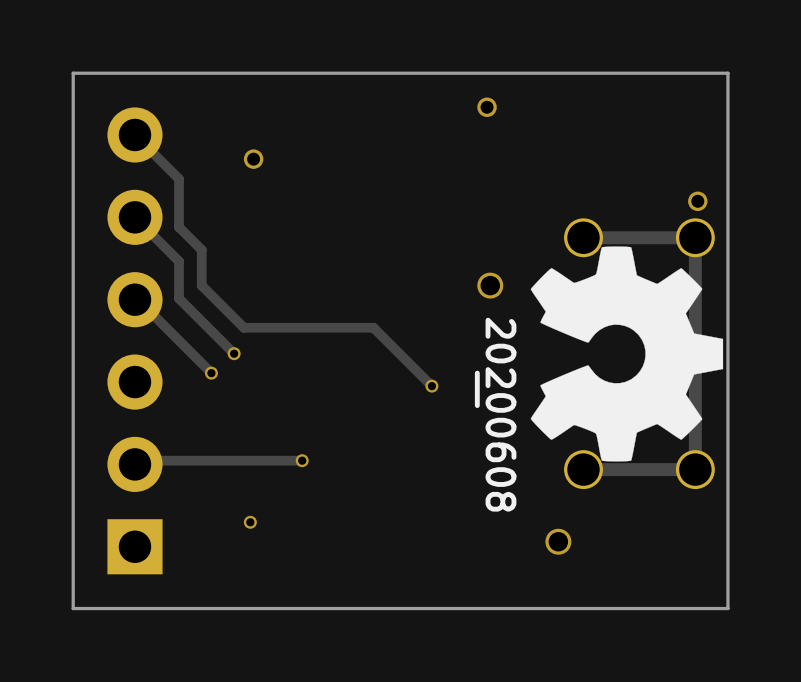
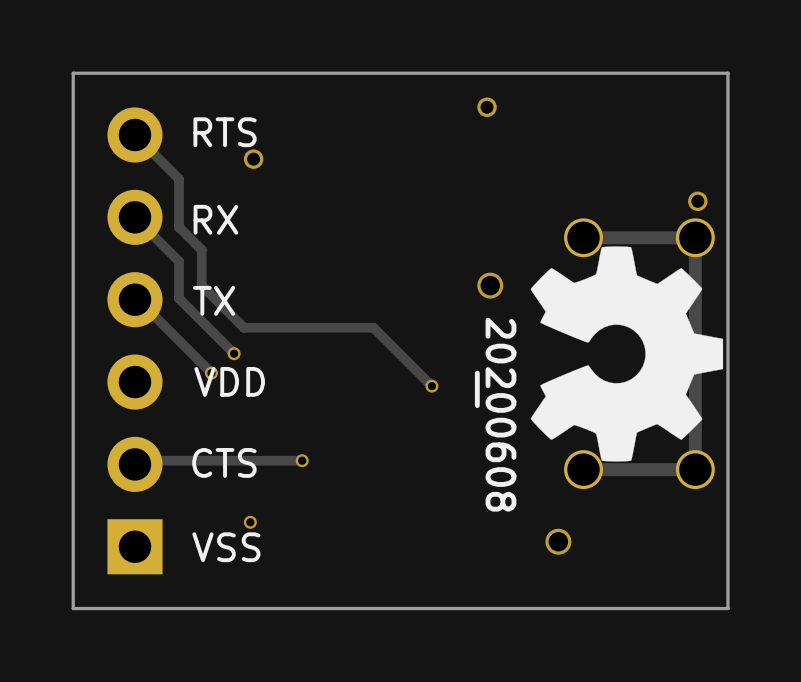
text: none -> RTS (225, 132)
text: none -> RX (215, 219)
text: none -> TX (214, 300)
text: none -> VDD (229, 381)
text: none -> CTS (224, 462)
text: none -> VSS (226, 547)

